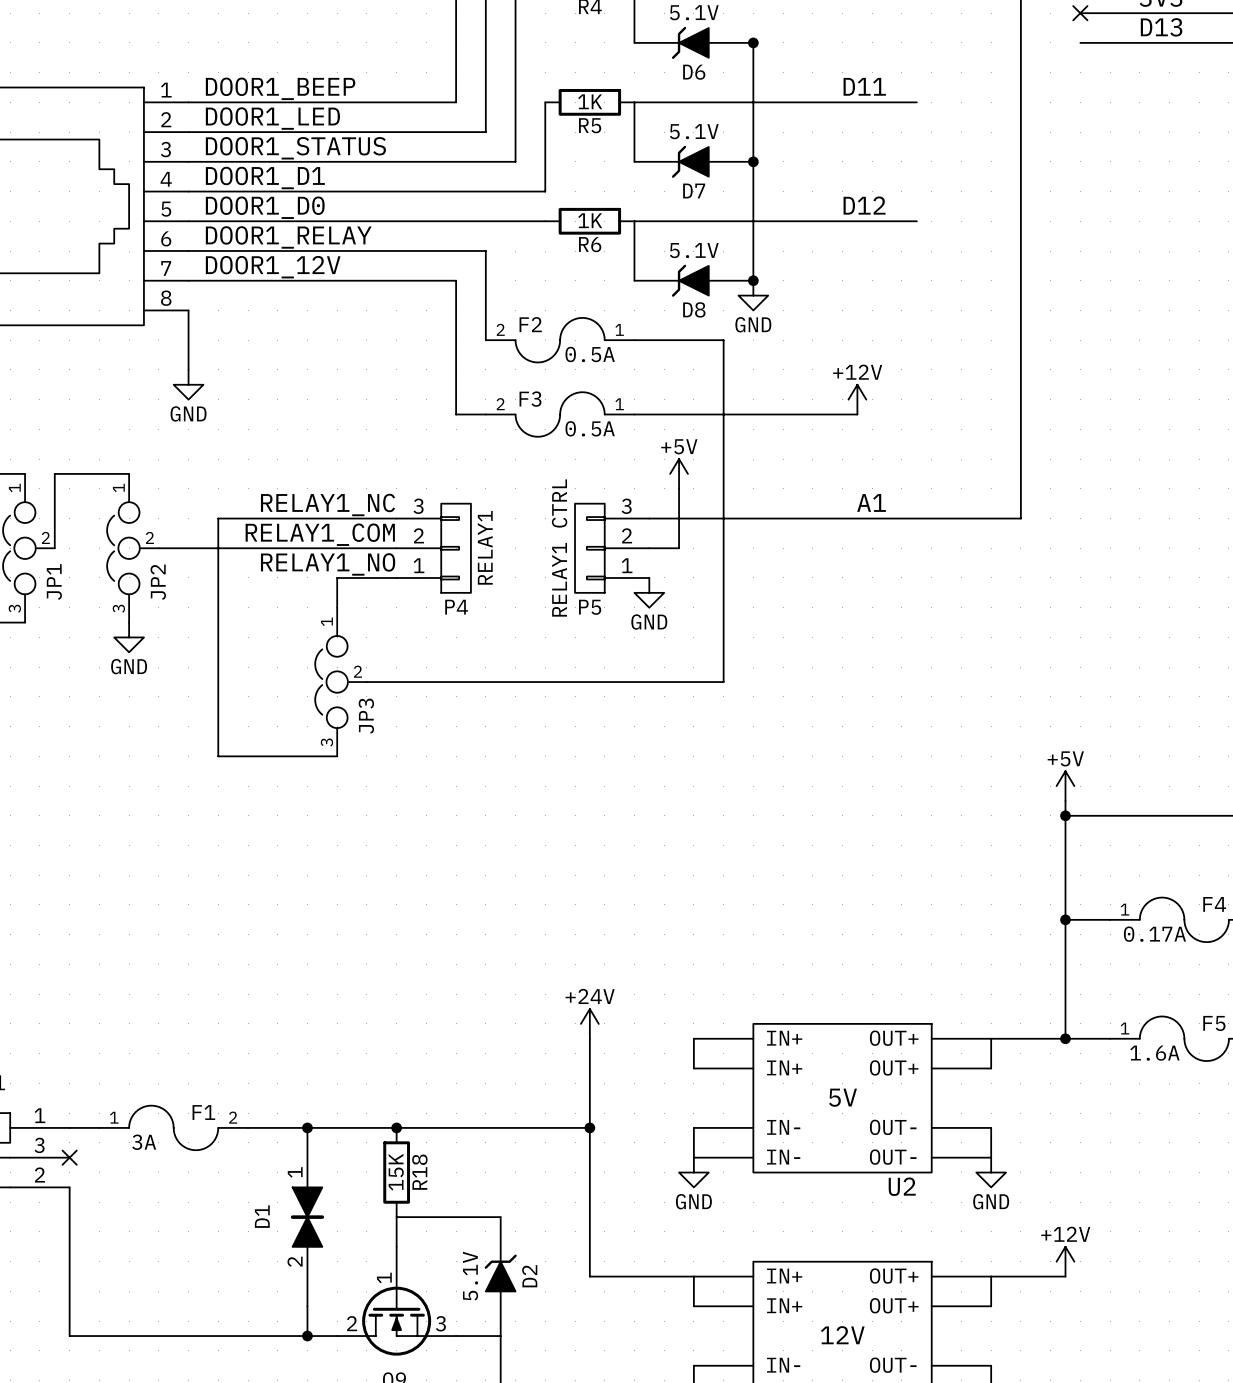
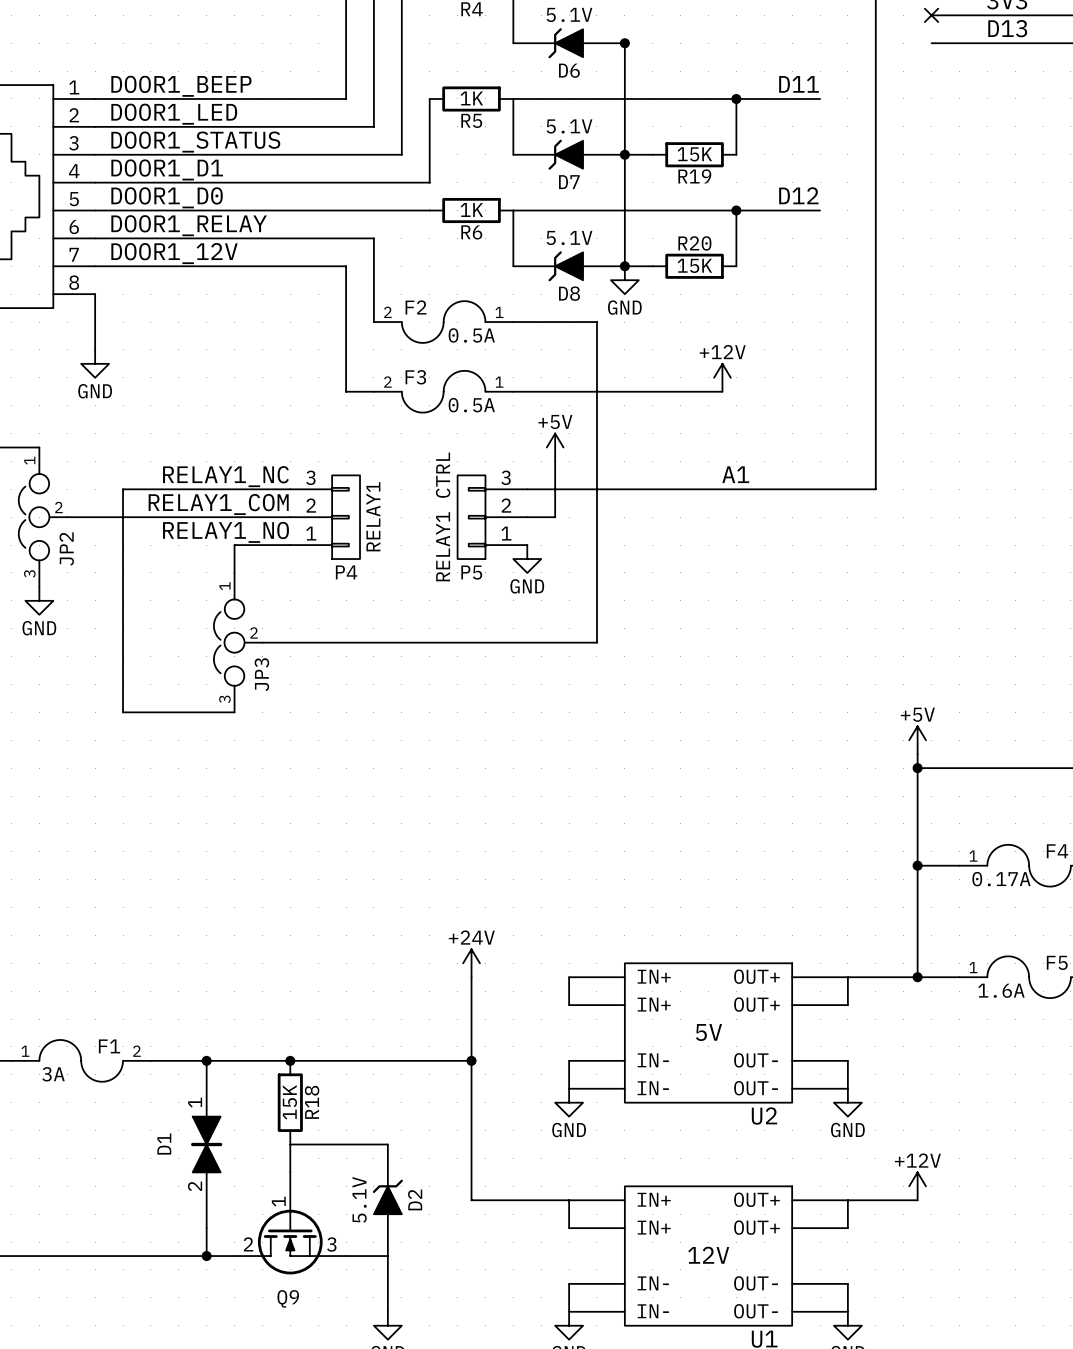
label position: D11 (864, 86) -> D11 (799, 84)
wire: none -> (736, 98) (736, 154)
junction: none -> (736, 98)
wire: none -> (778, 98) (820, 98)
wire: none -> (624, 154) (652, 154)
R19: none -> 15K (694, 154)
label position: D12 (864, 205) -> D12 (798, 195)
wire: none -> (736, 210) (736, 266)
junction: none -> (736, 210)
wire: none -> (778, 210) (820, 210)
wire: none -> (624, 266) (652, 266)
R20: none -> 15K (694, 266)

